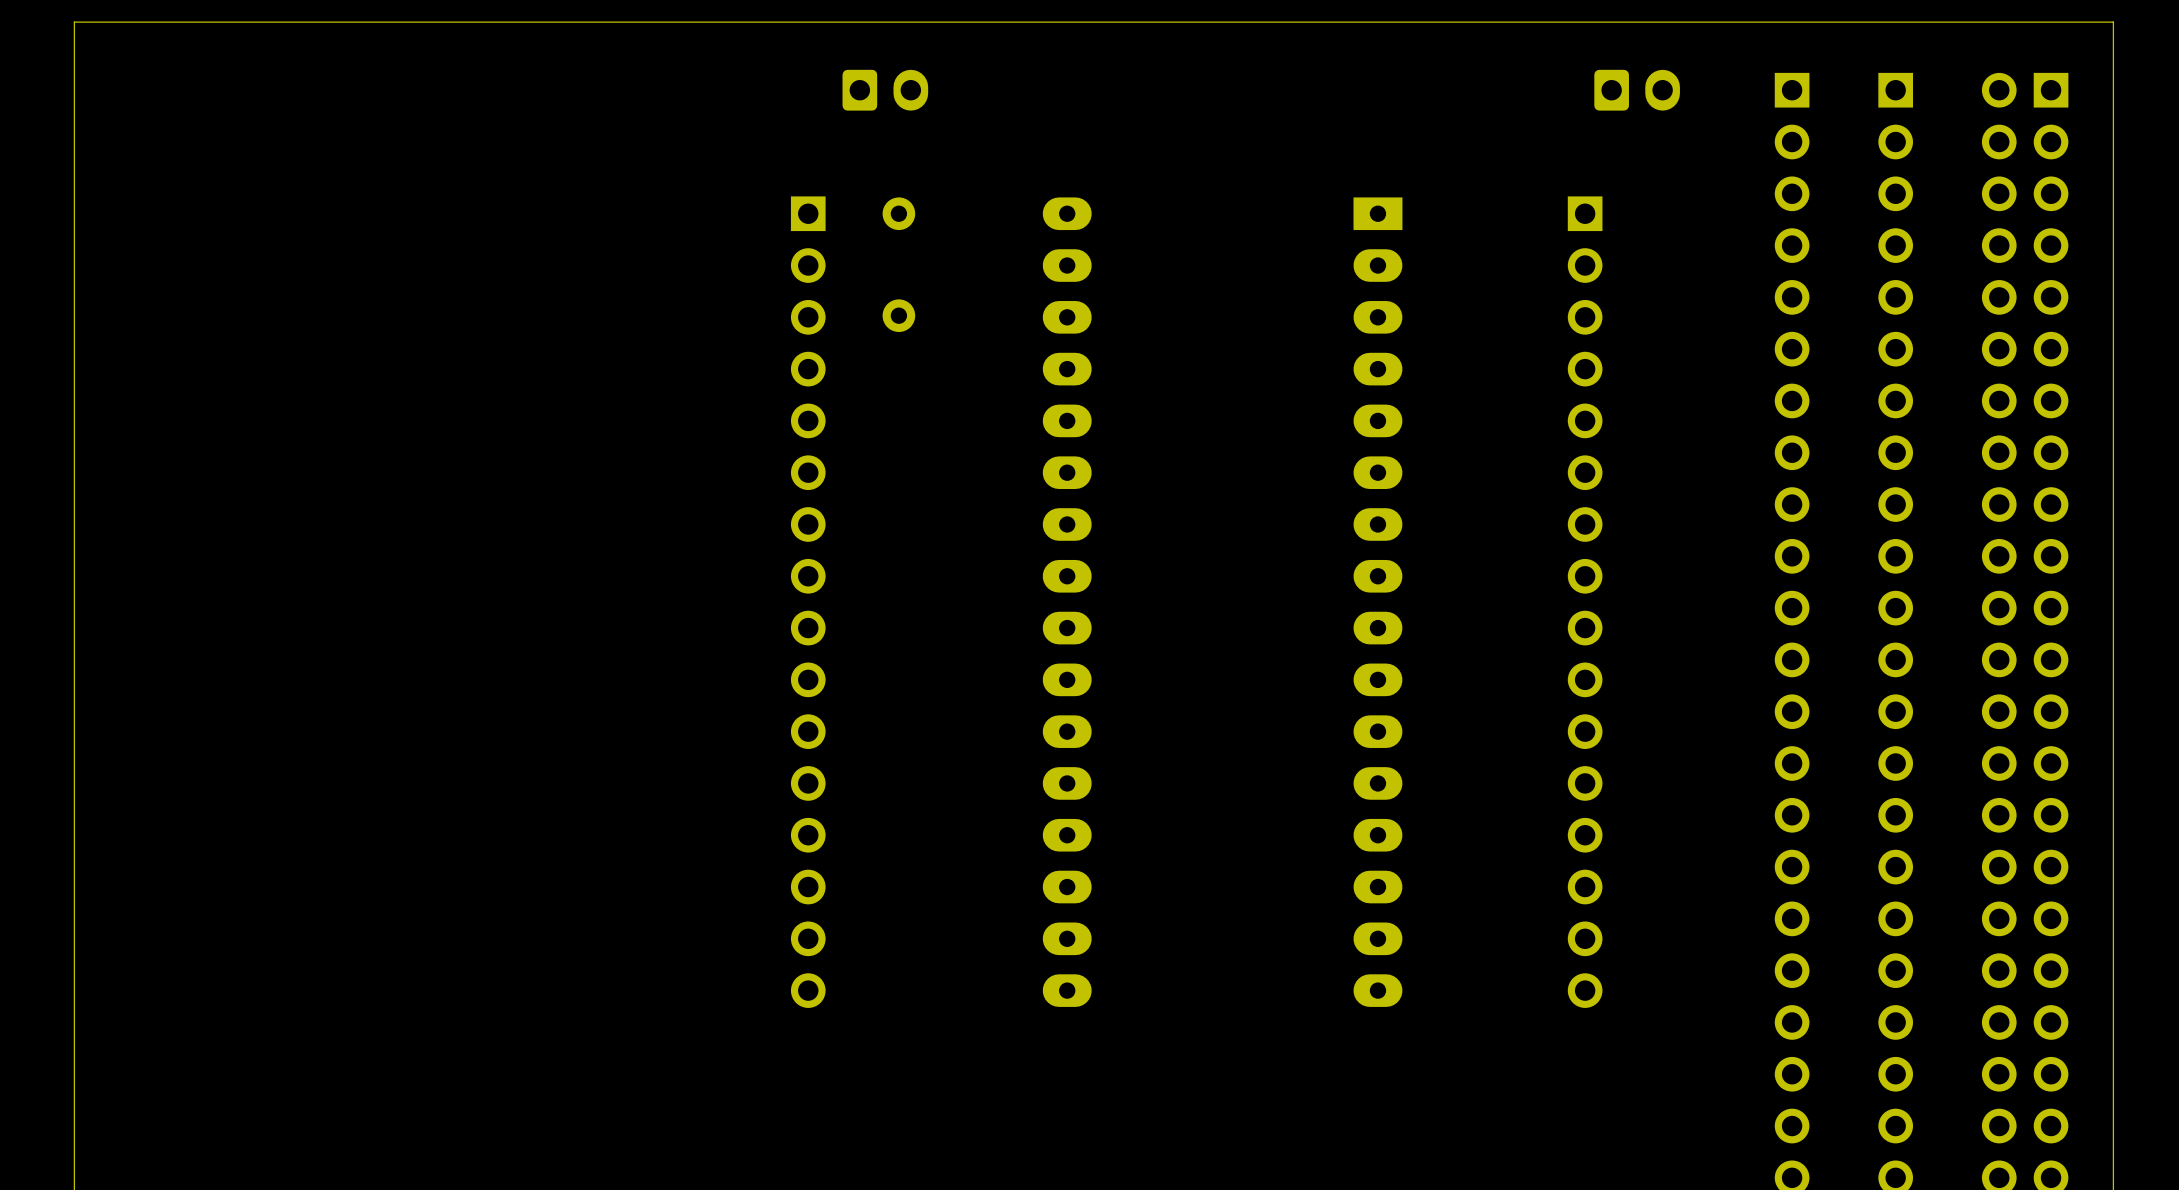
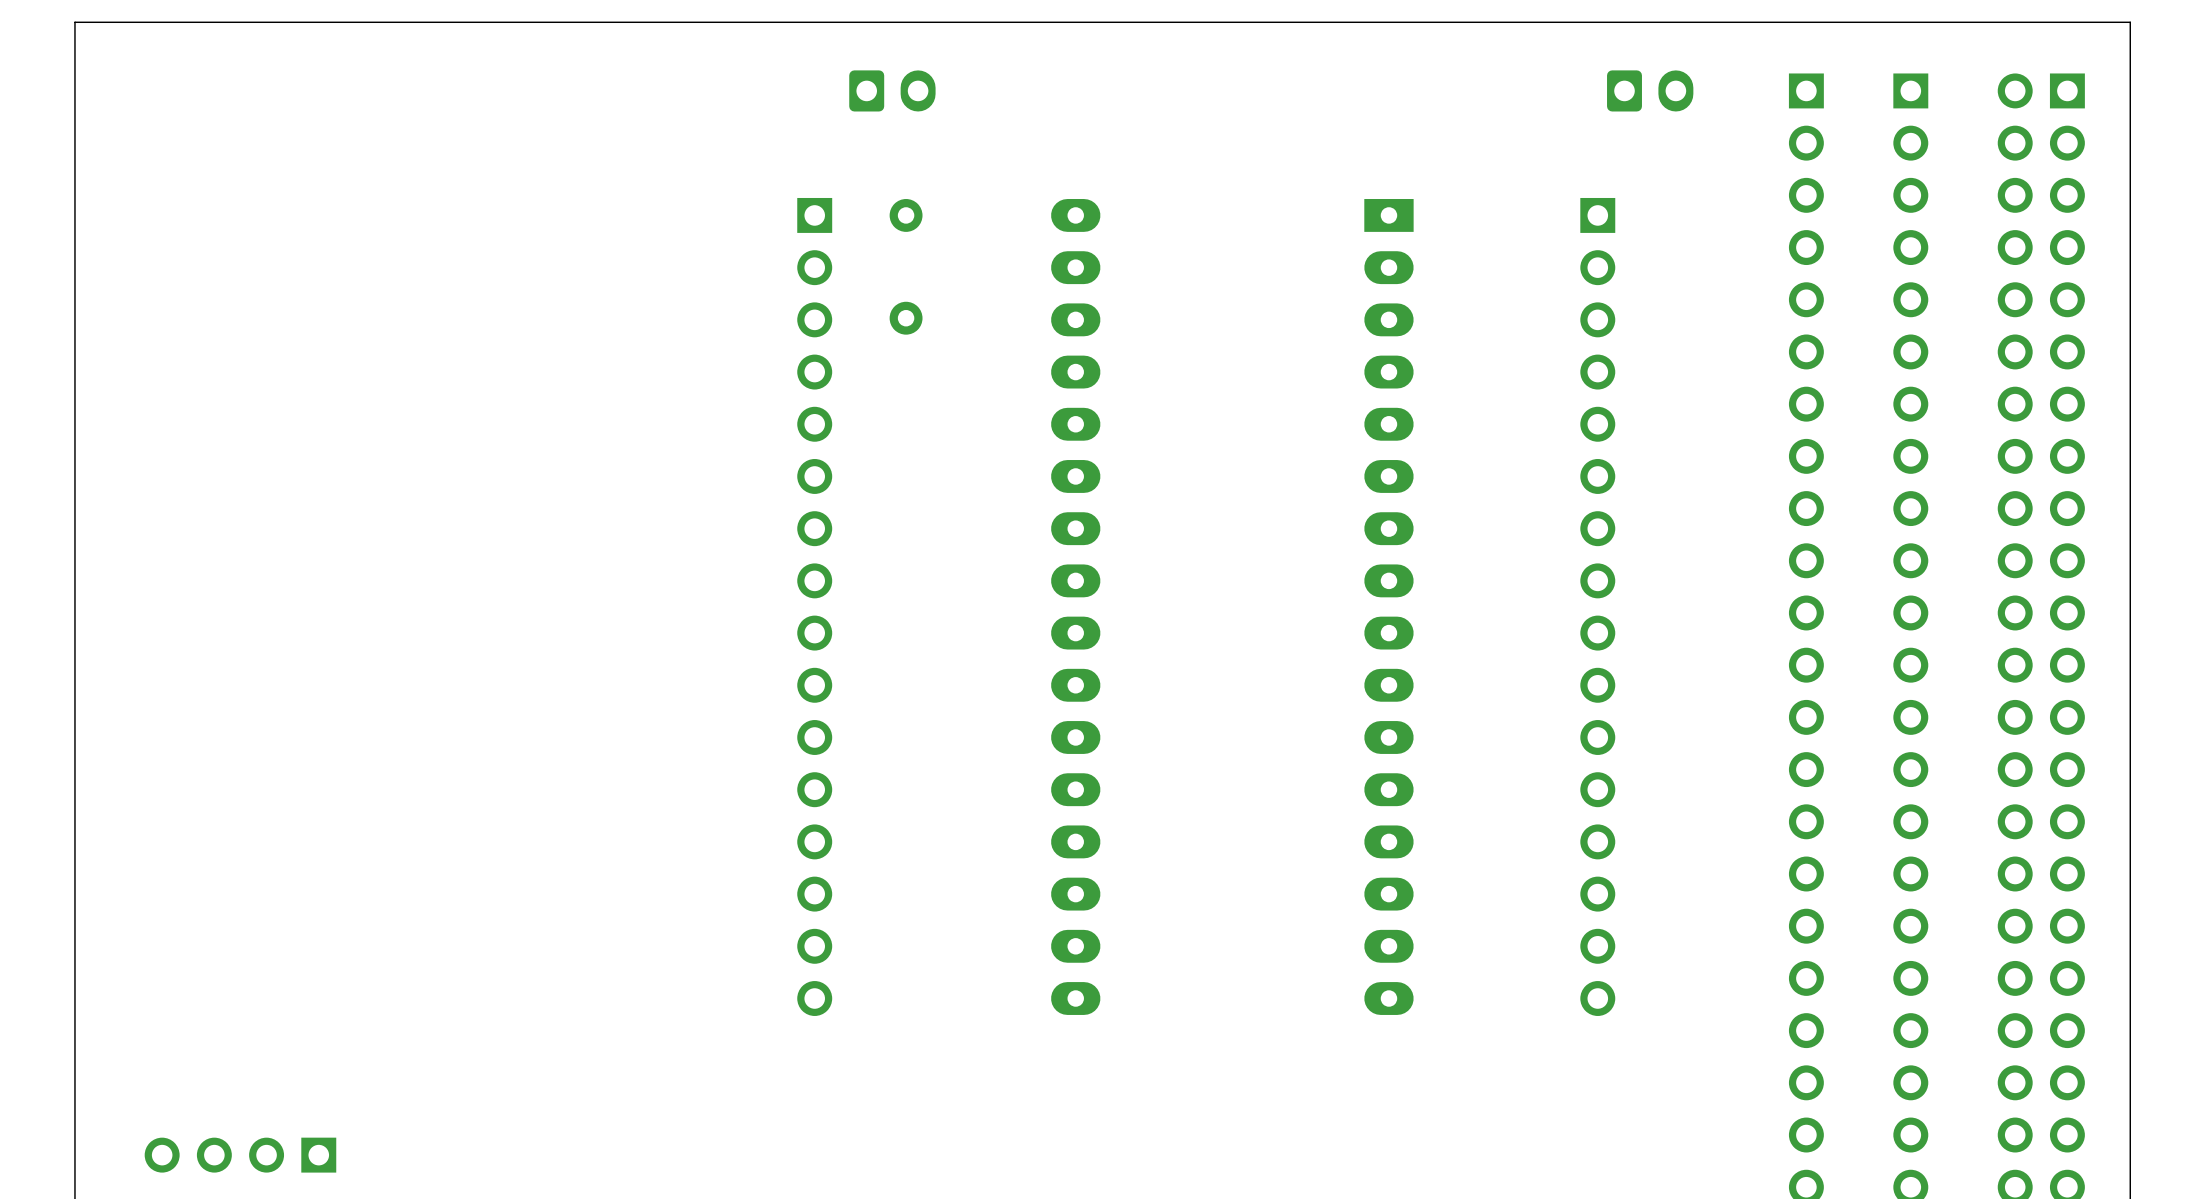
part: none -> (240, 1155)

